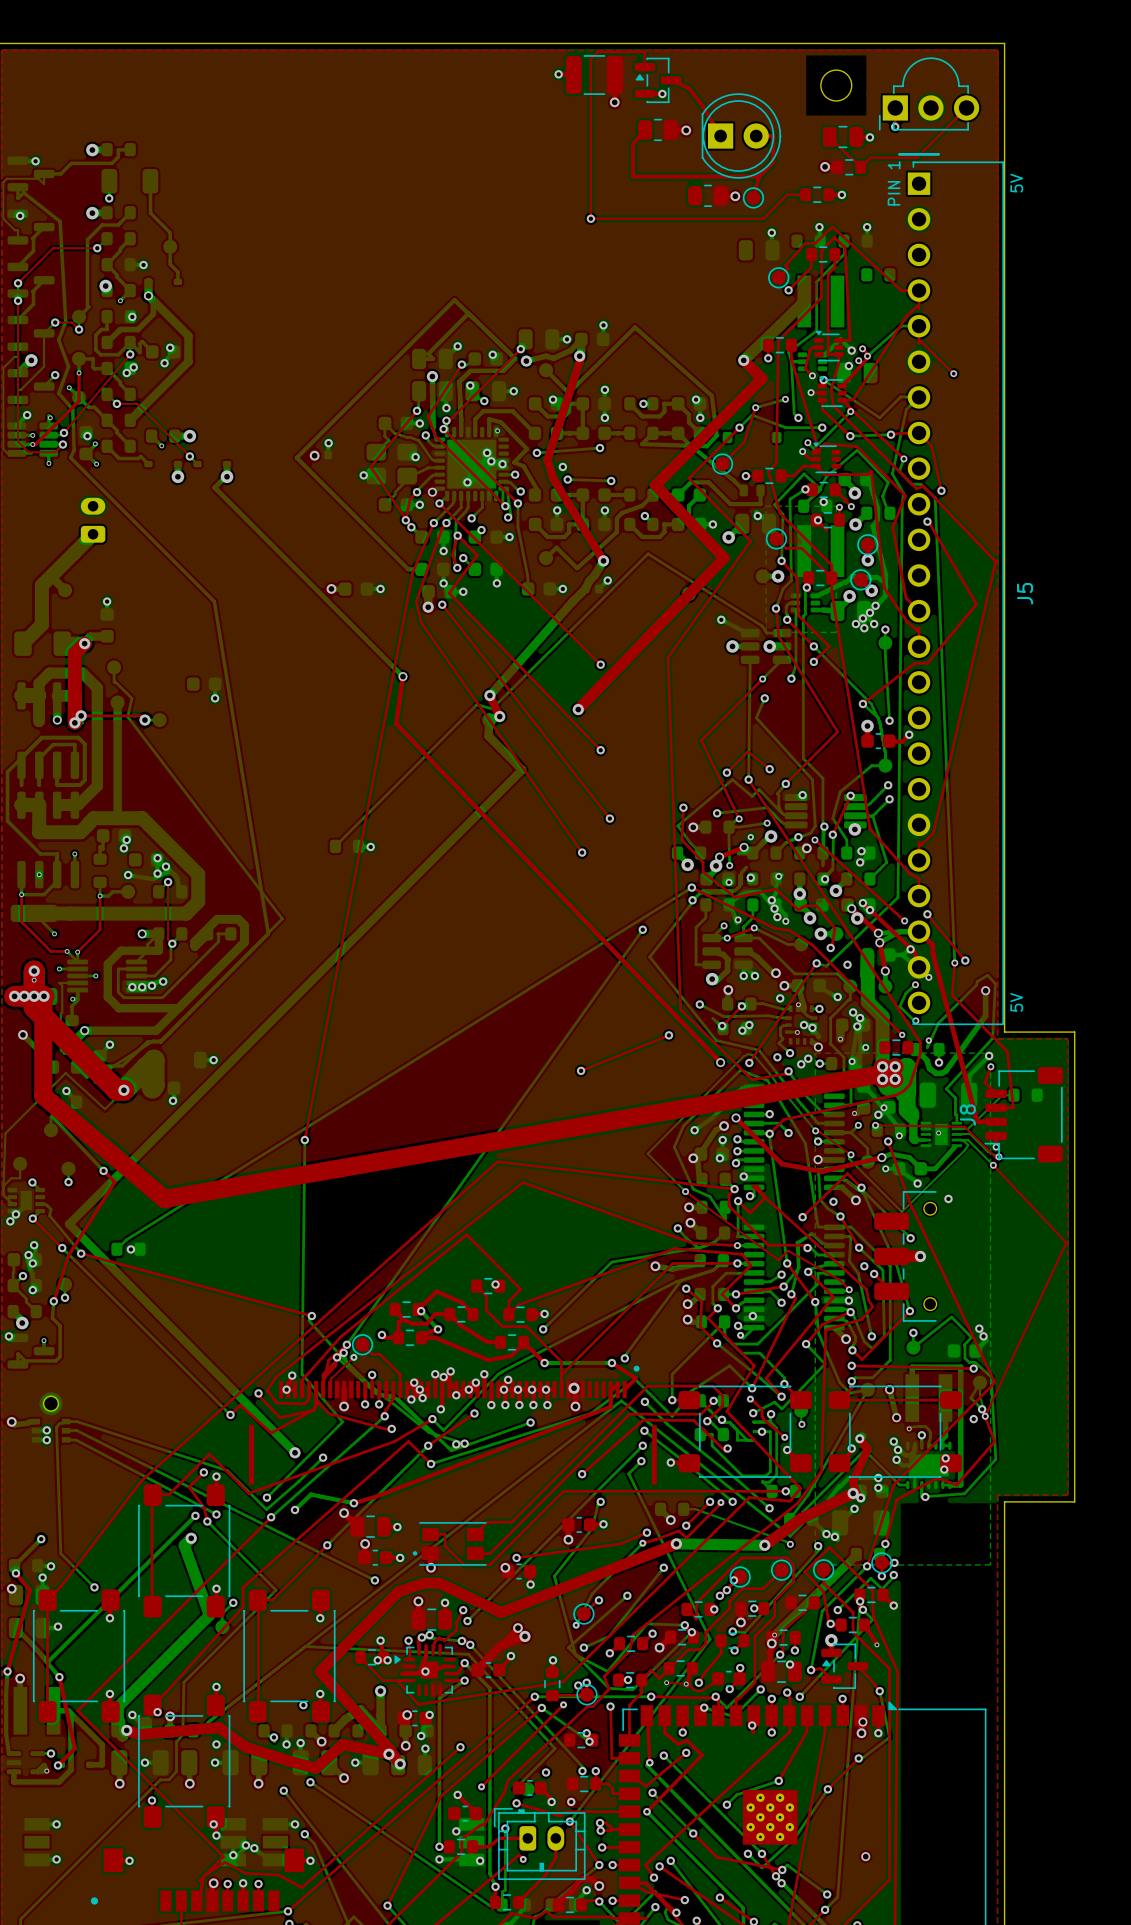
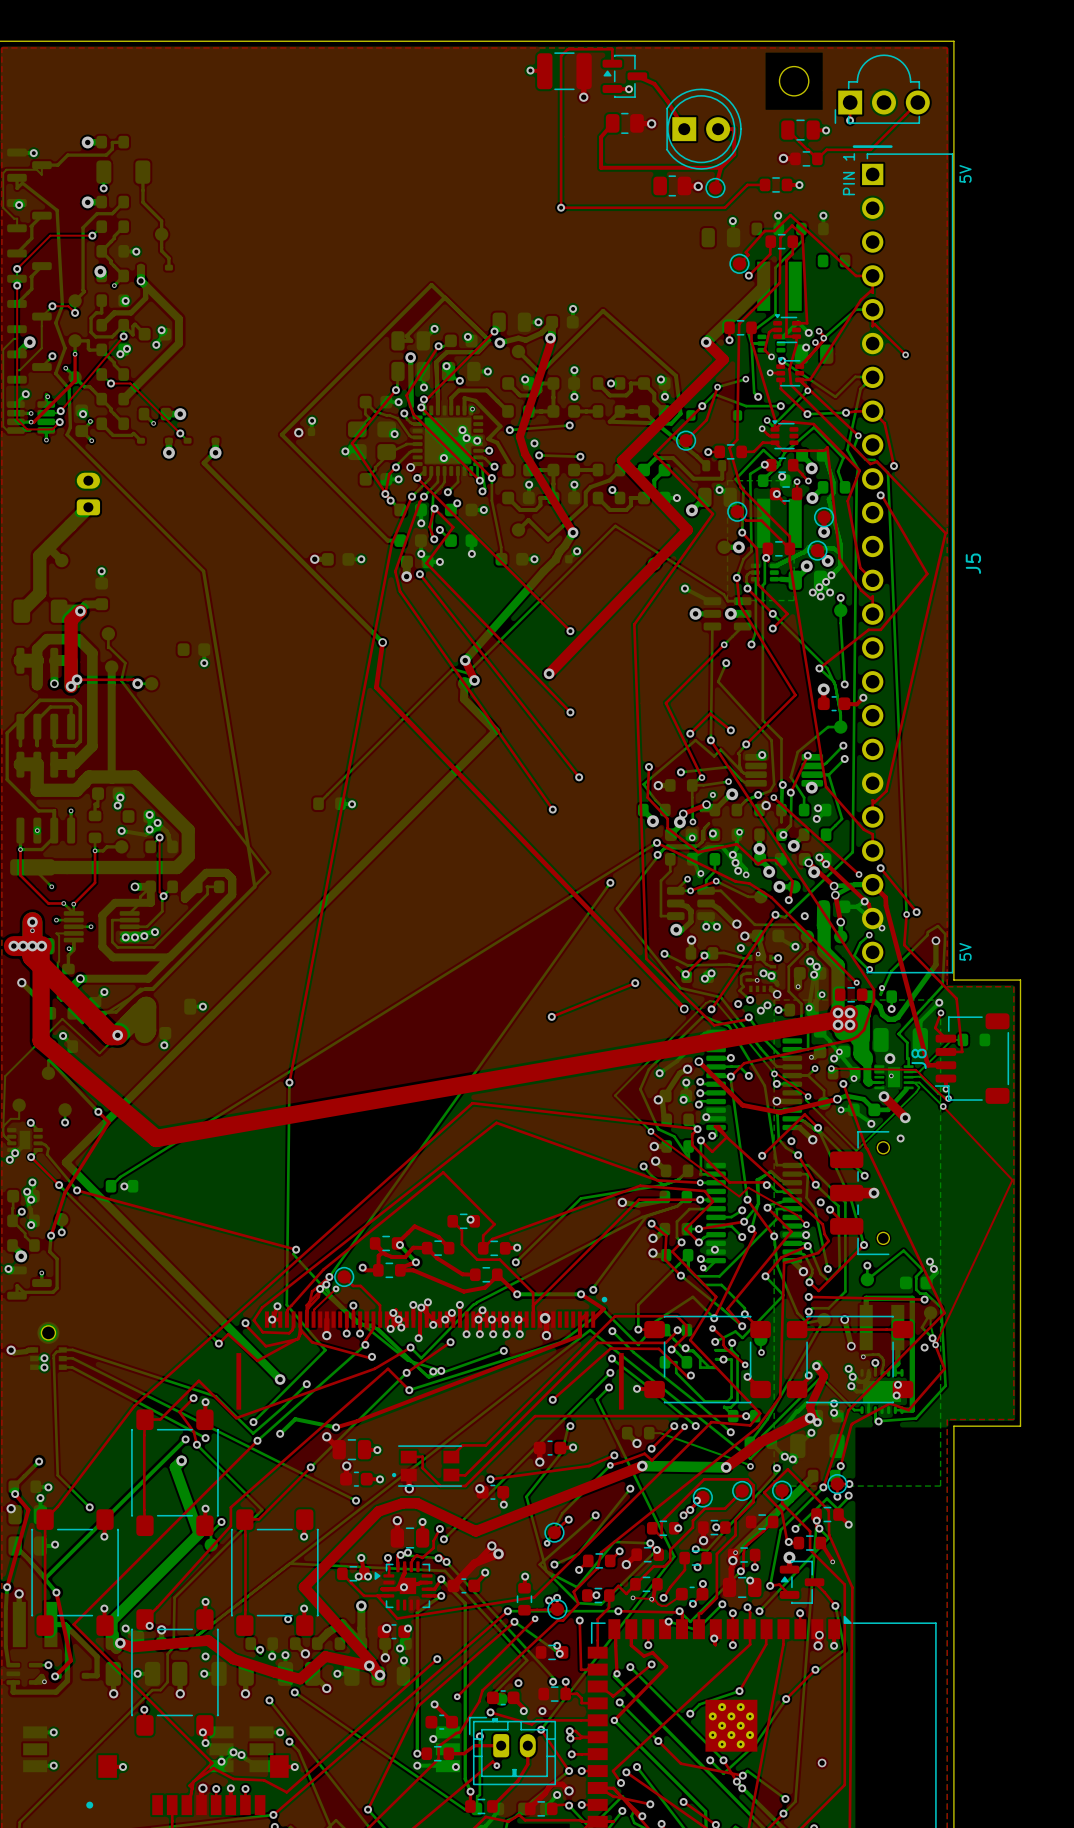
via: none -> (890, 1058)
top track: none -> (884, 1096) (905, 1117)
via: none -> (884, 1096)
via: none -> (905, 1117)

